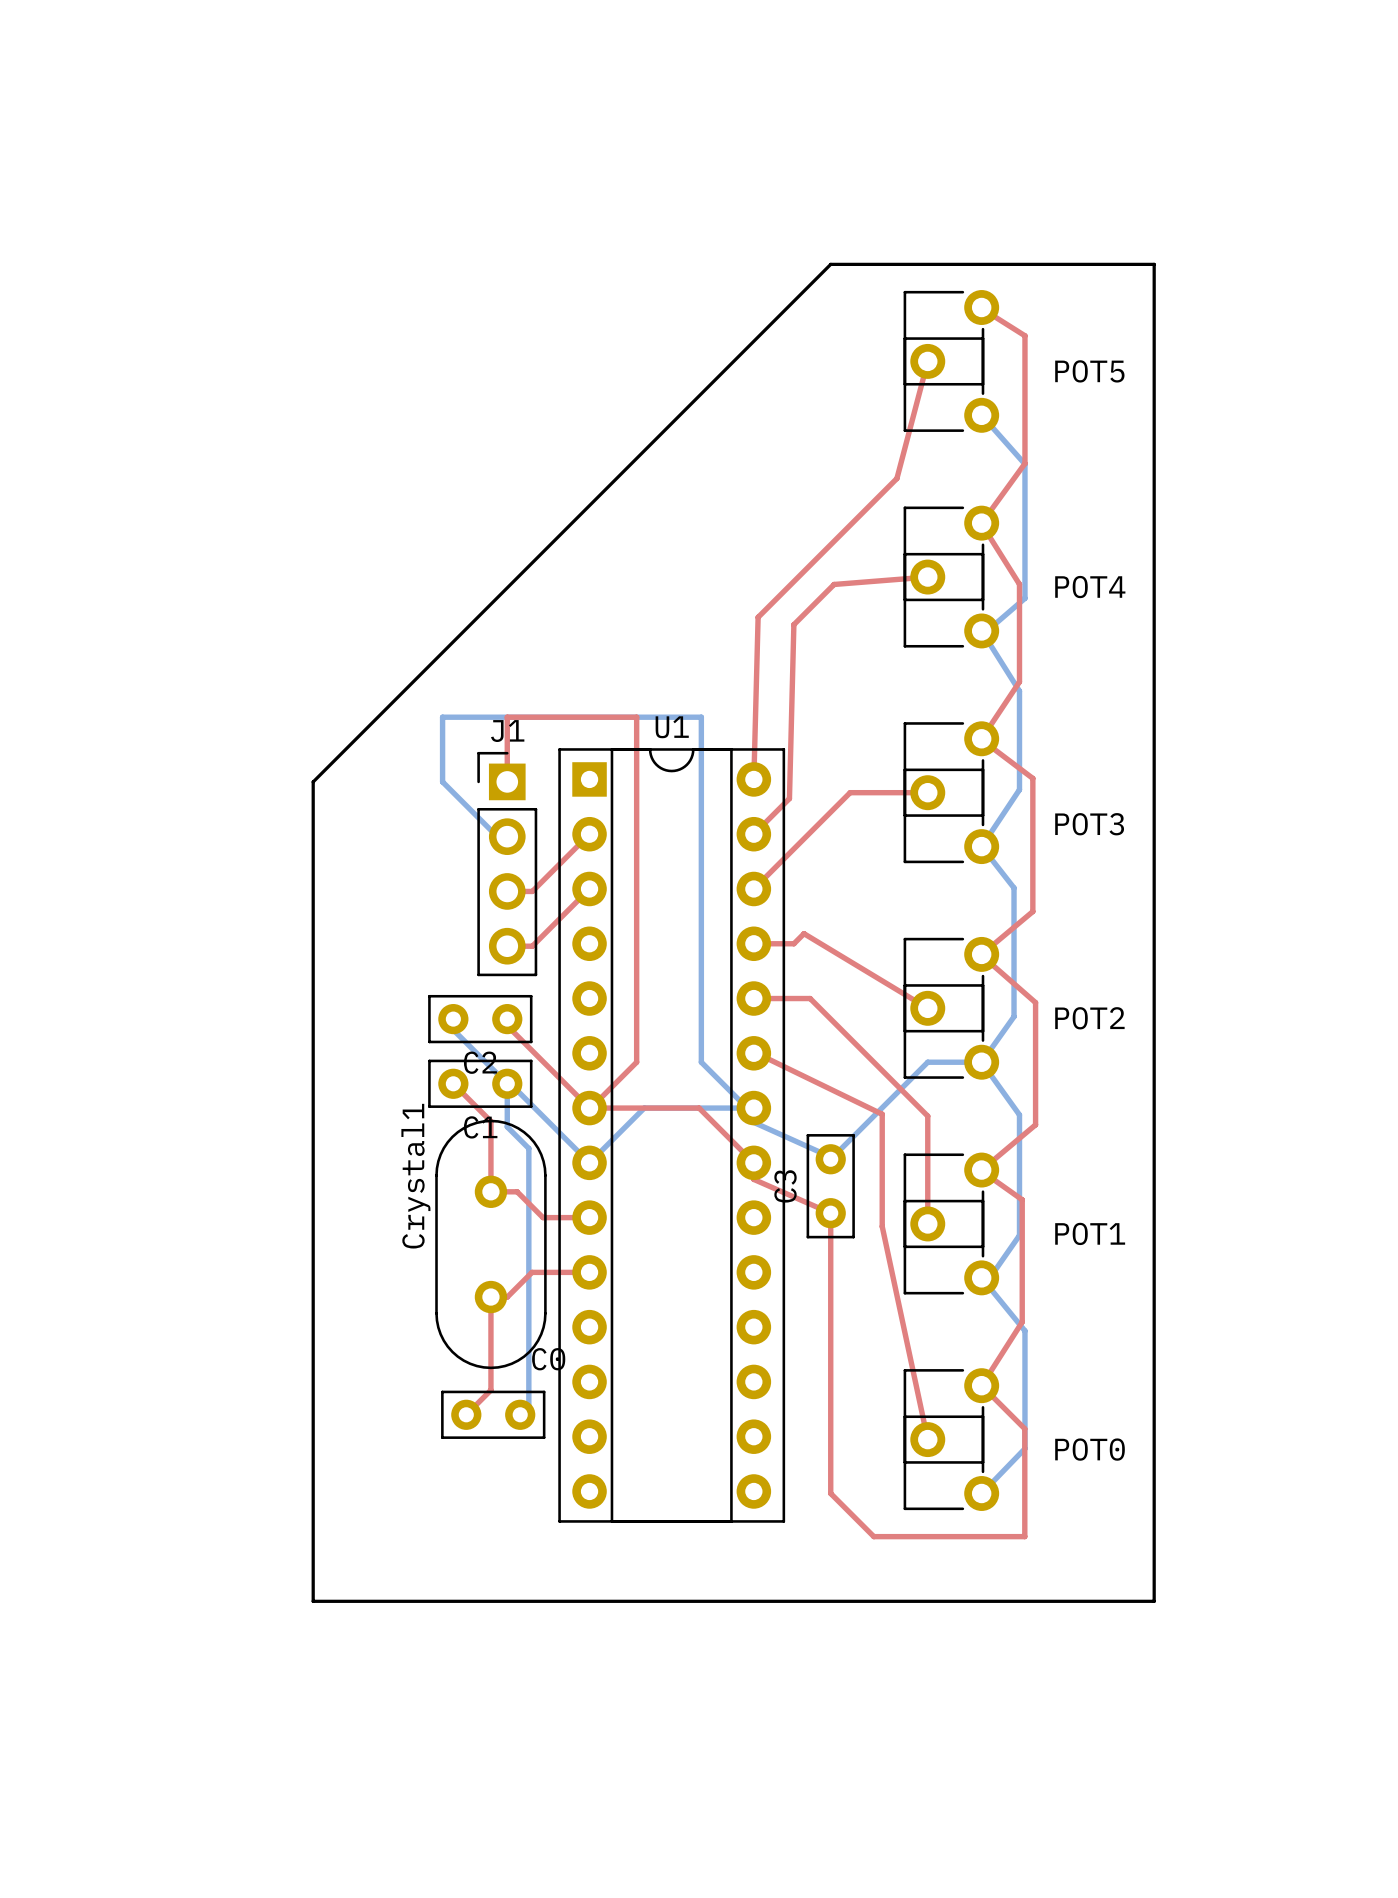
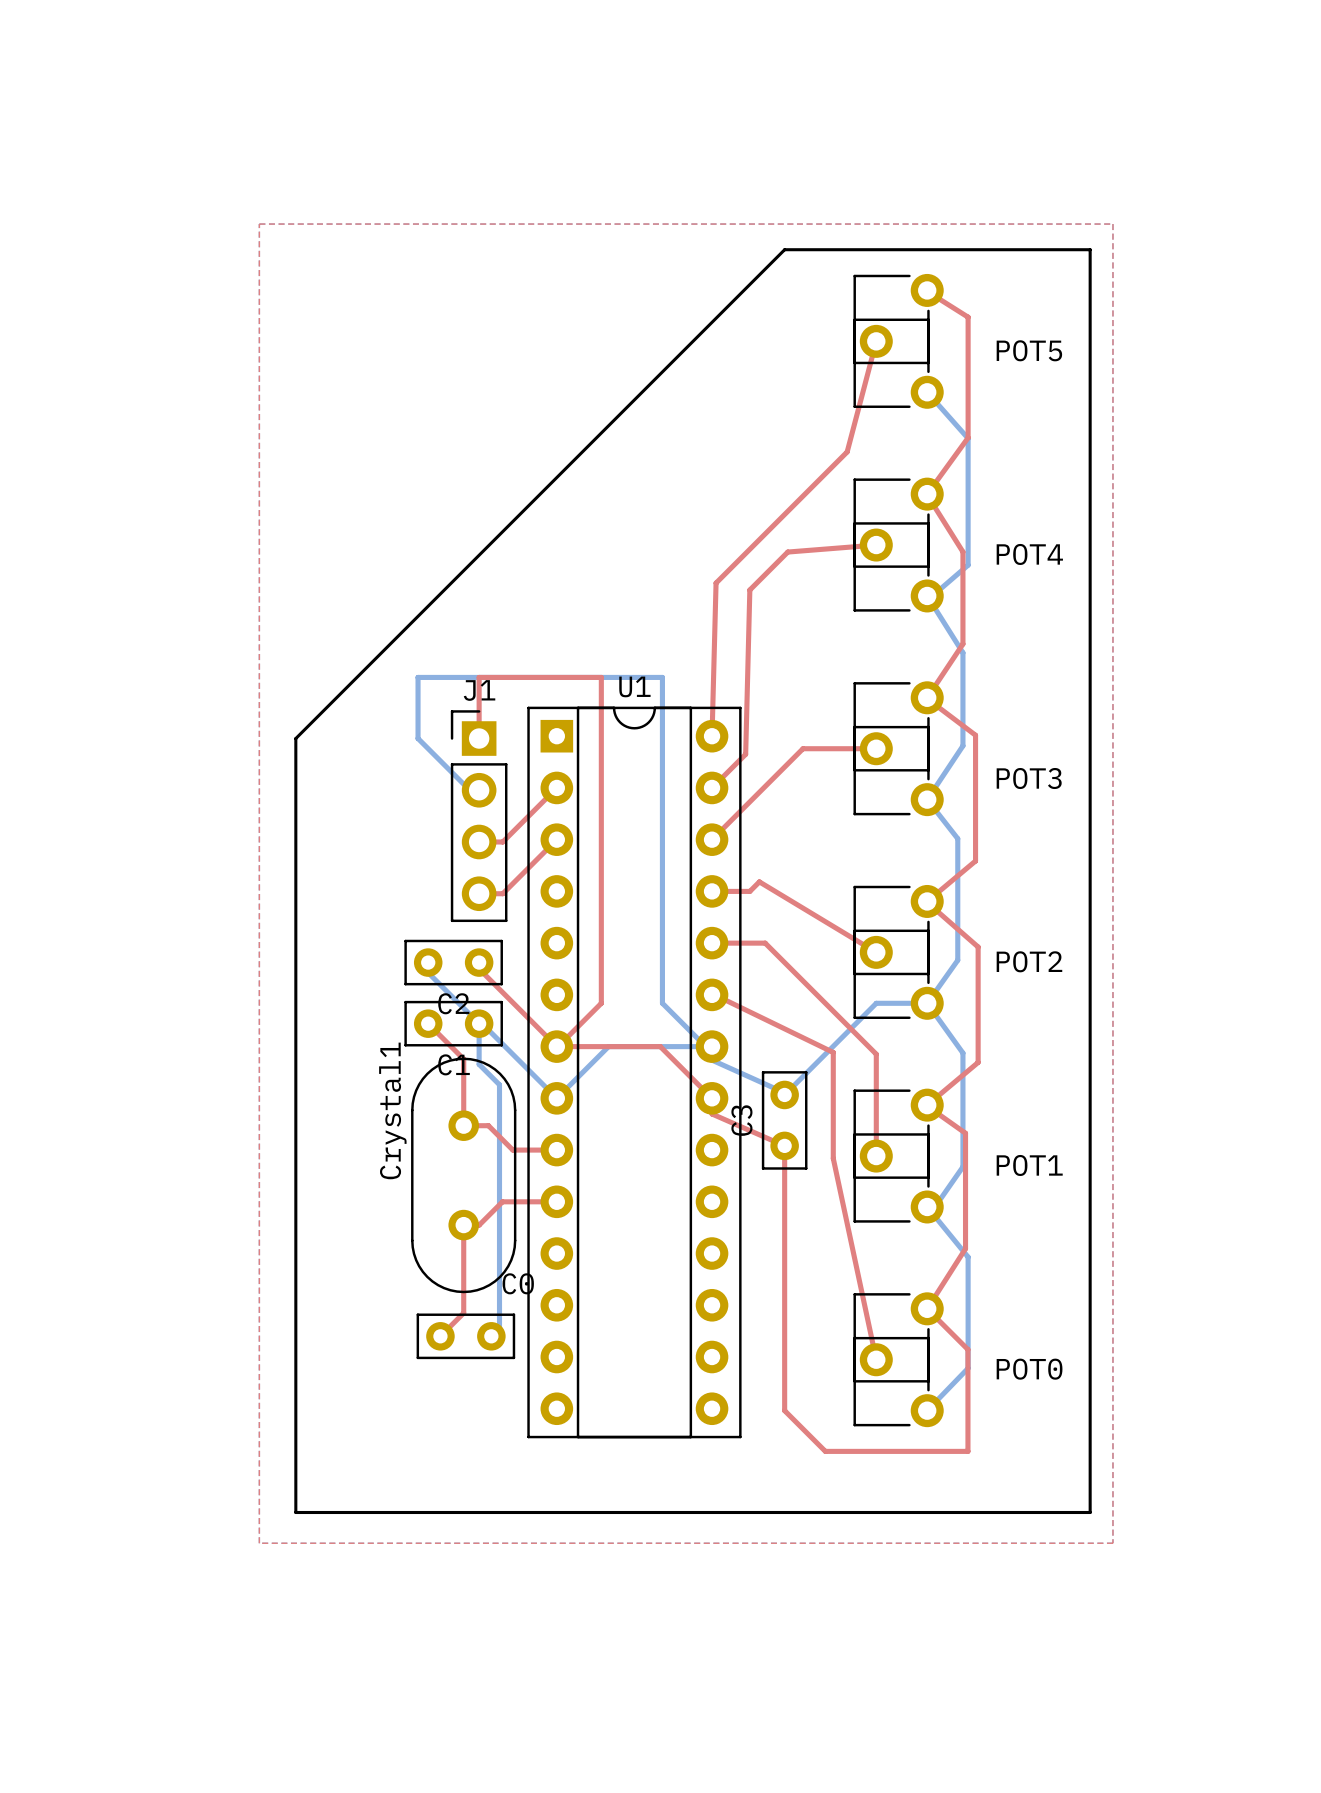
top zone outline: none -> (259, 224) (259, 1543) (1112, 1543) (1112, 224) (259, 224)

